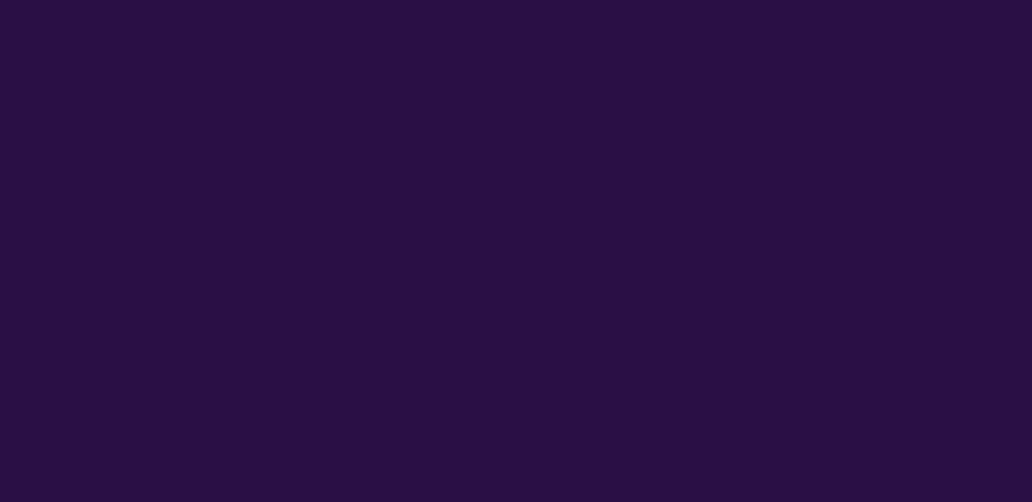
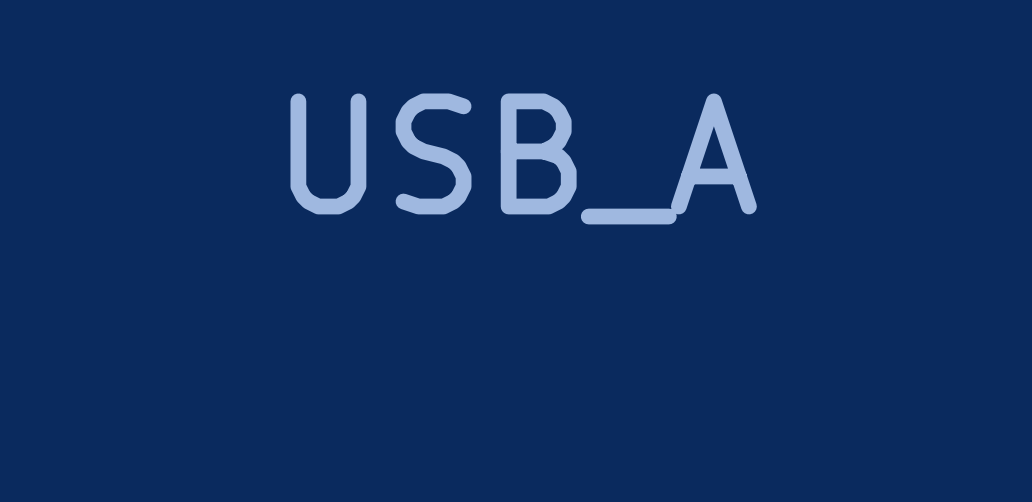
text: none -> USB_A (523, 158)

